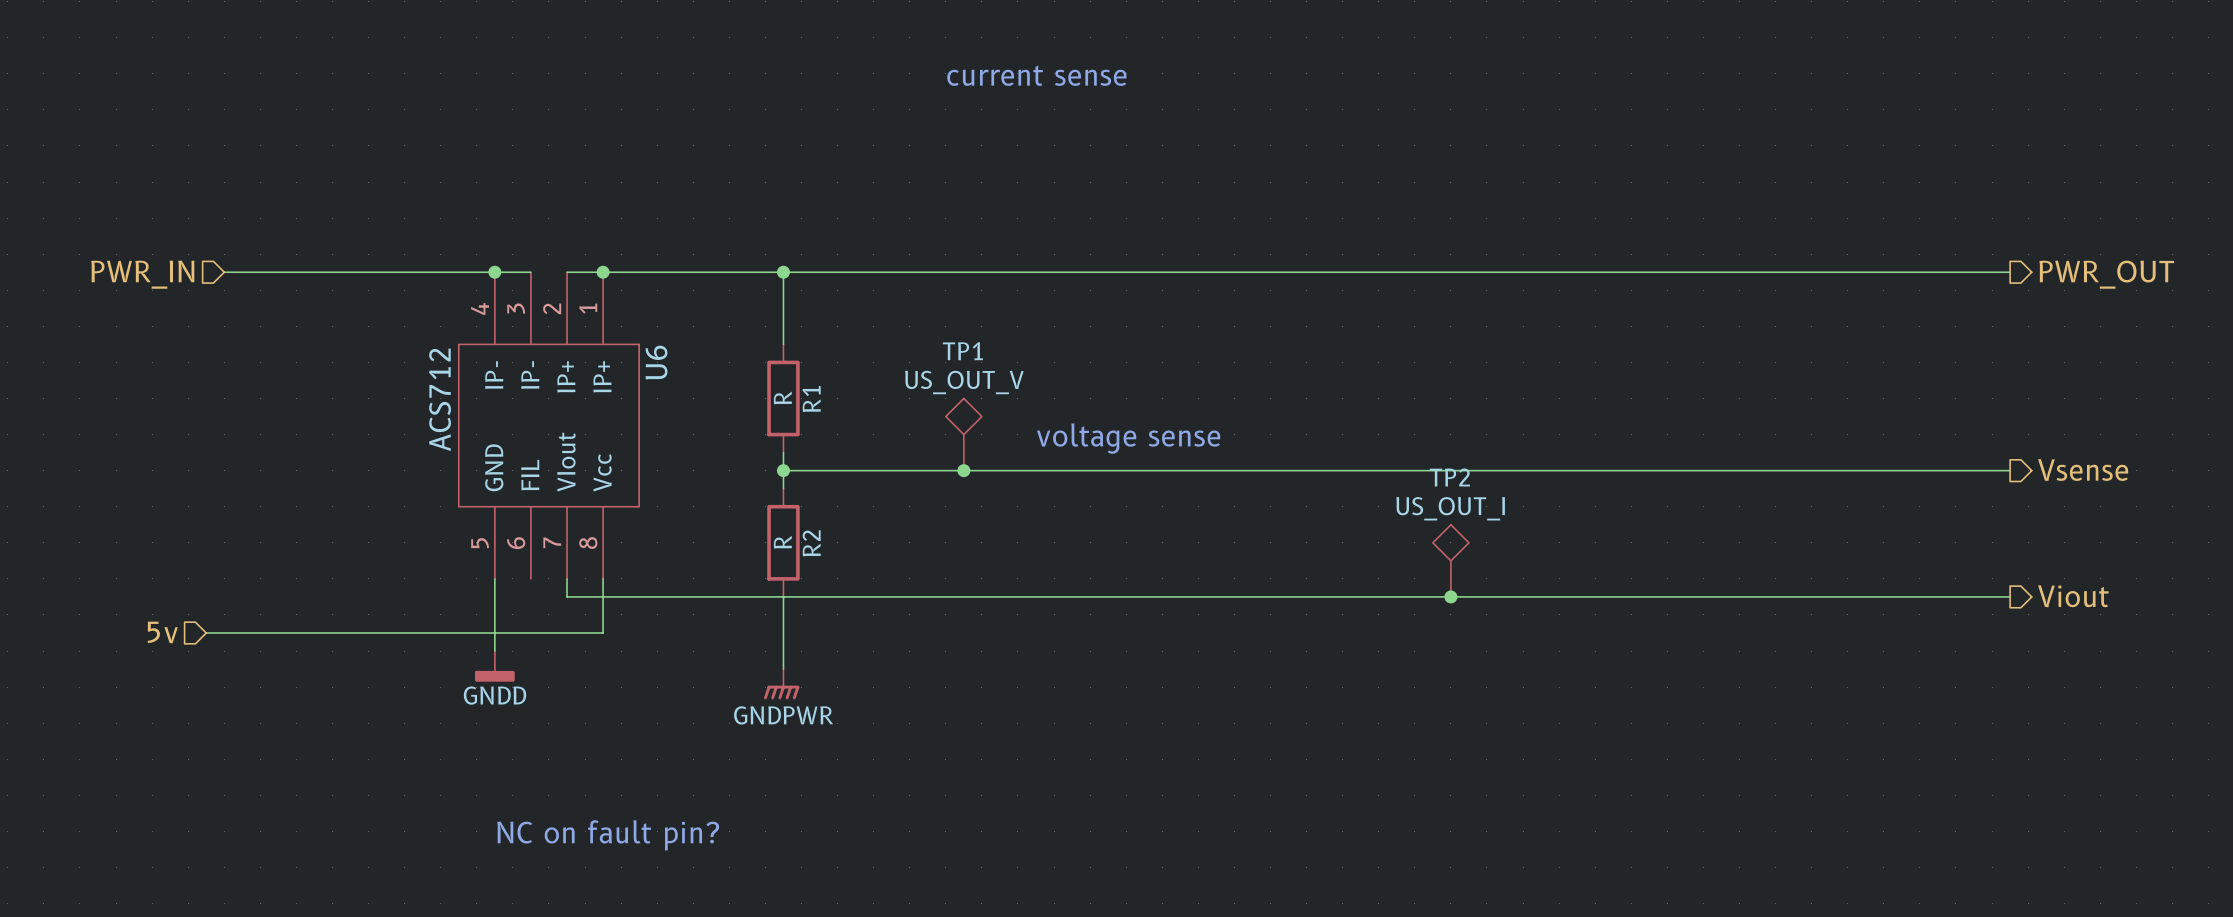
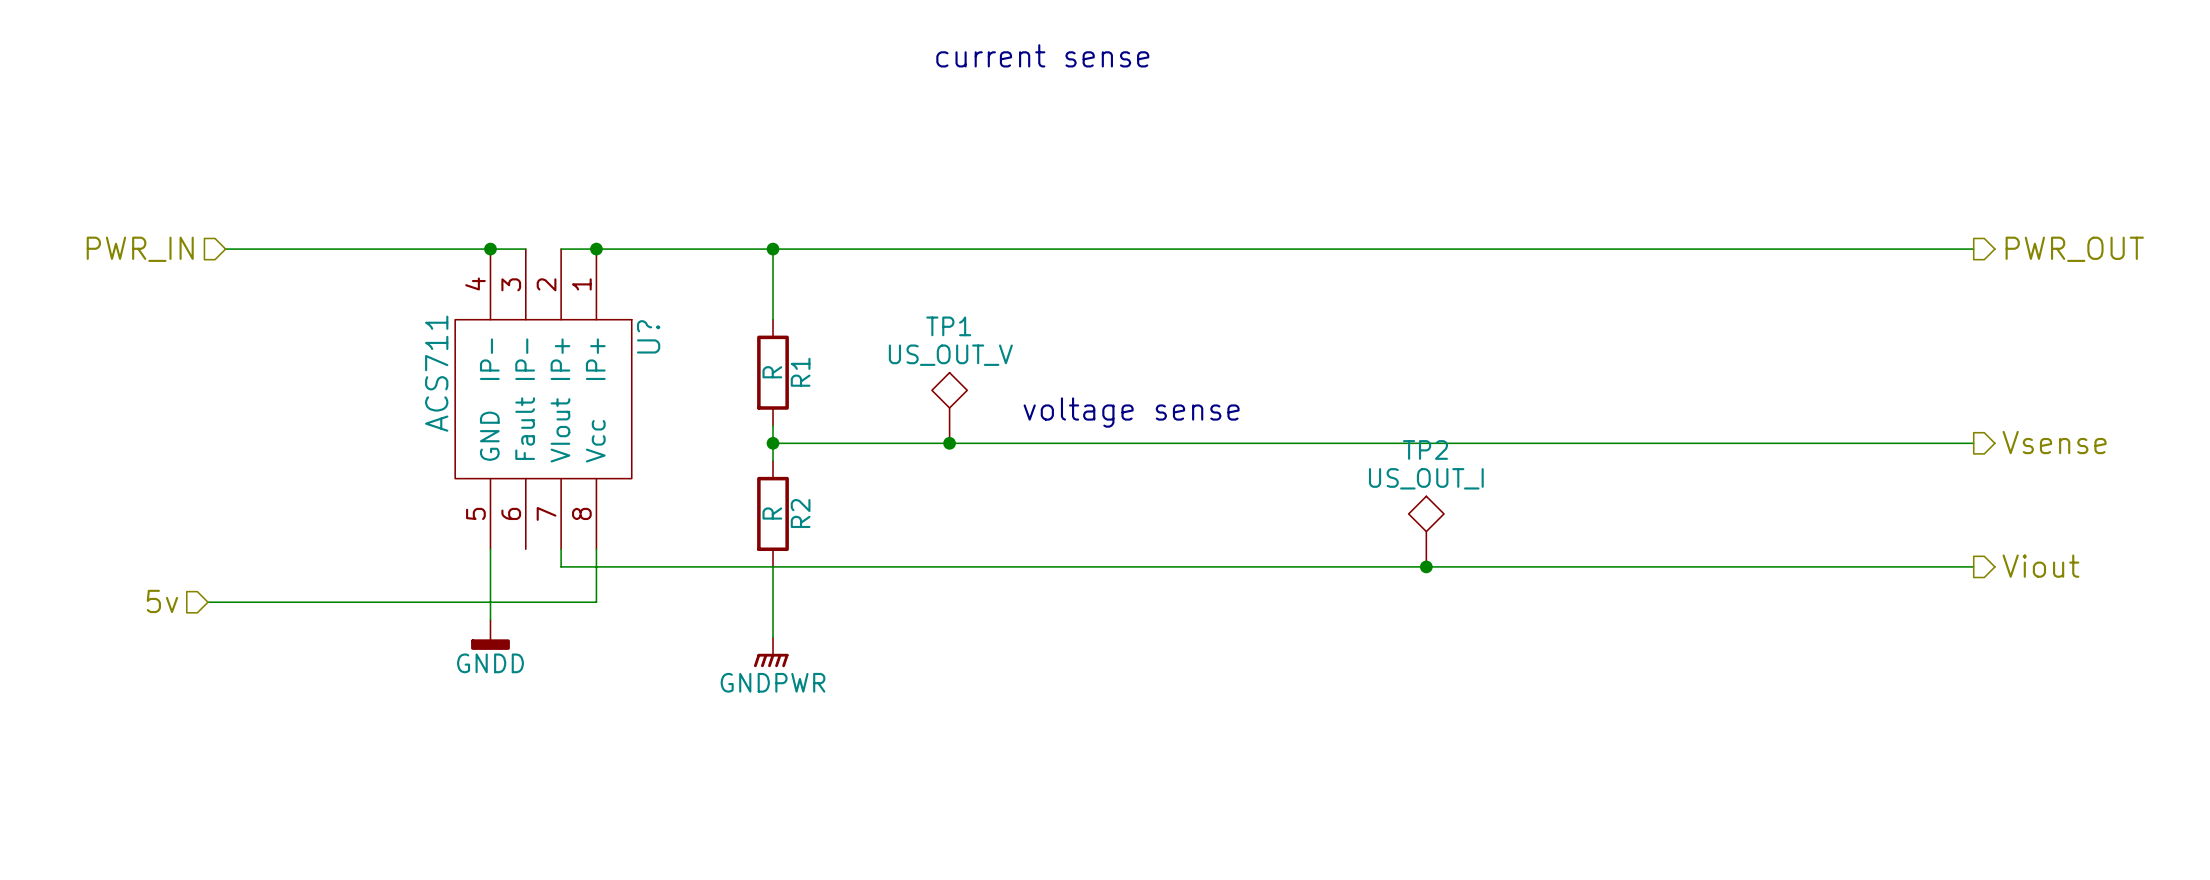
U6 name: U6 (656, 362) -> U? (648, 336)
U6 value: ACS712 (440, 399) -> ACS711 (436, 373)
U6 pin name: FIL (530, 475) -> Fault (525, 428)
text: NC on fault pin? (608, 835) -> none

